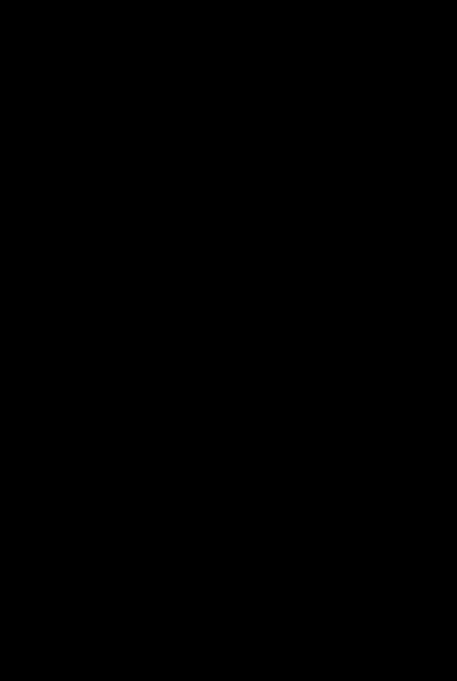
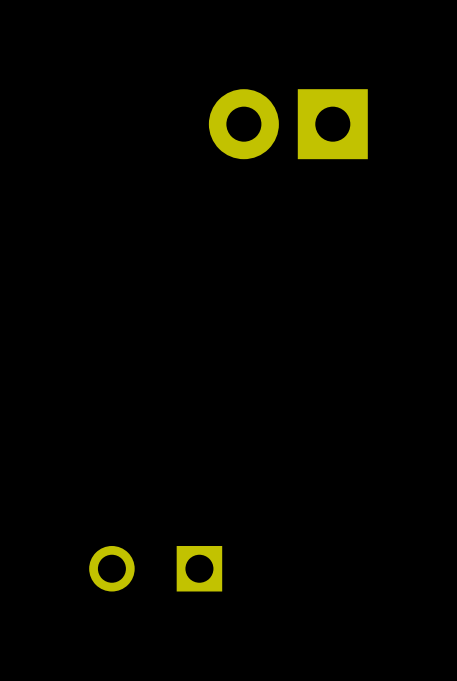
part: none -> (288, 124)
part: none -> (155, 568)

